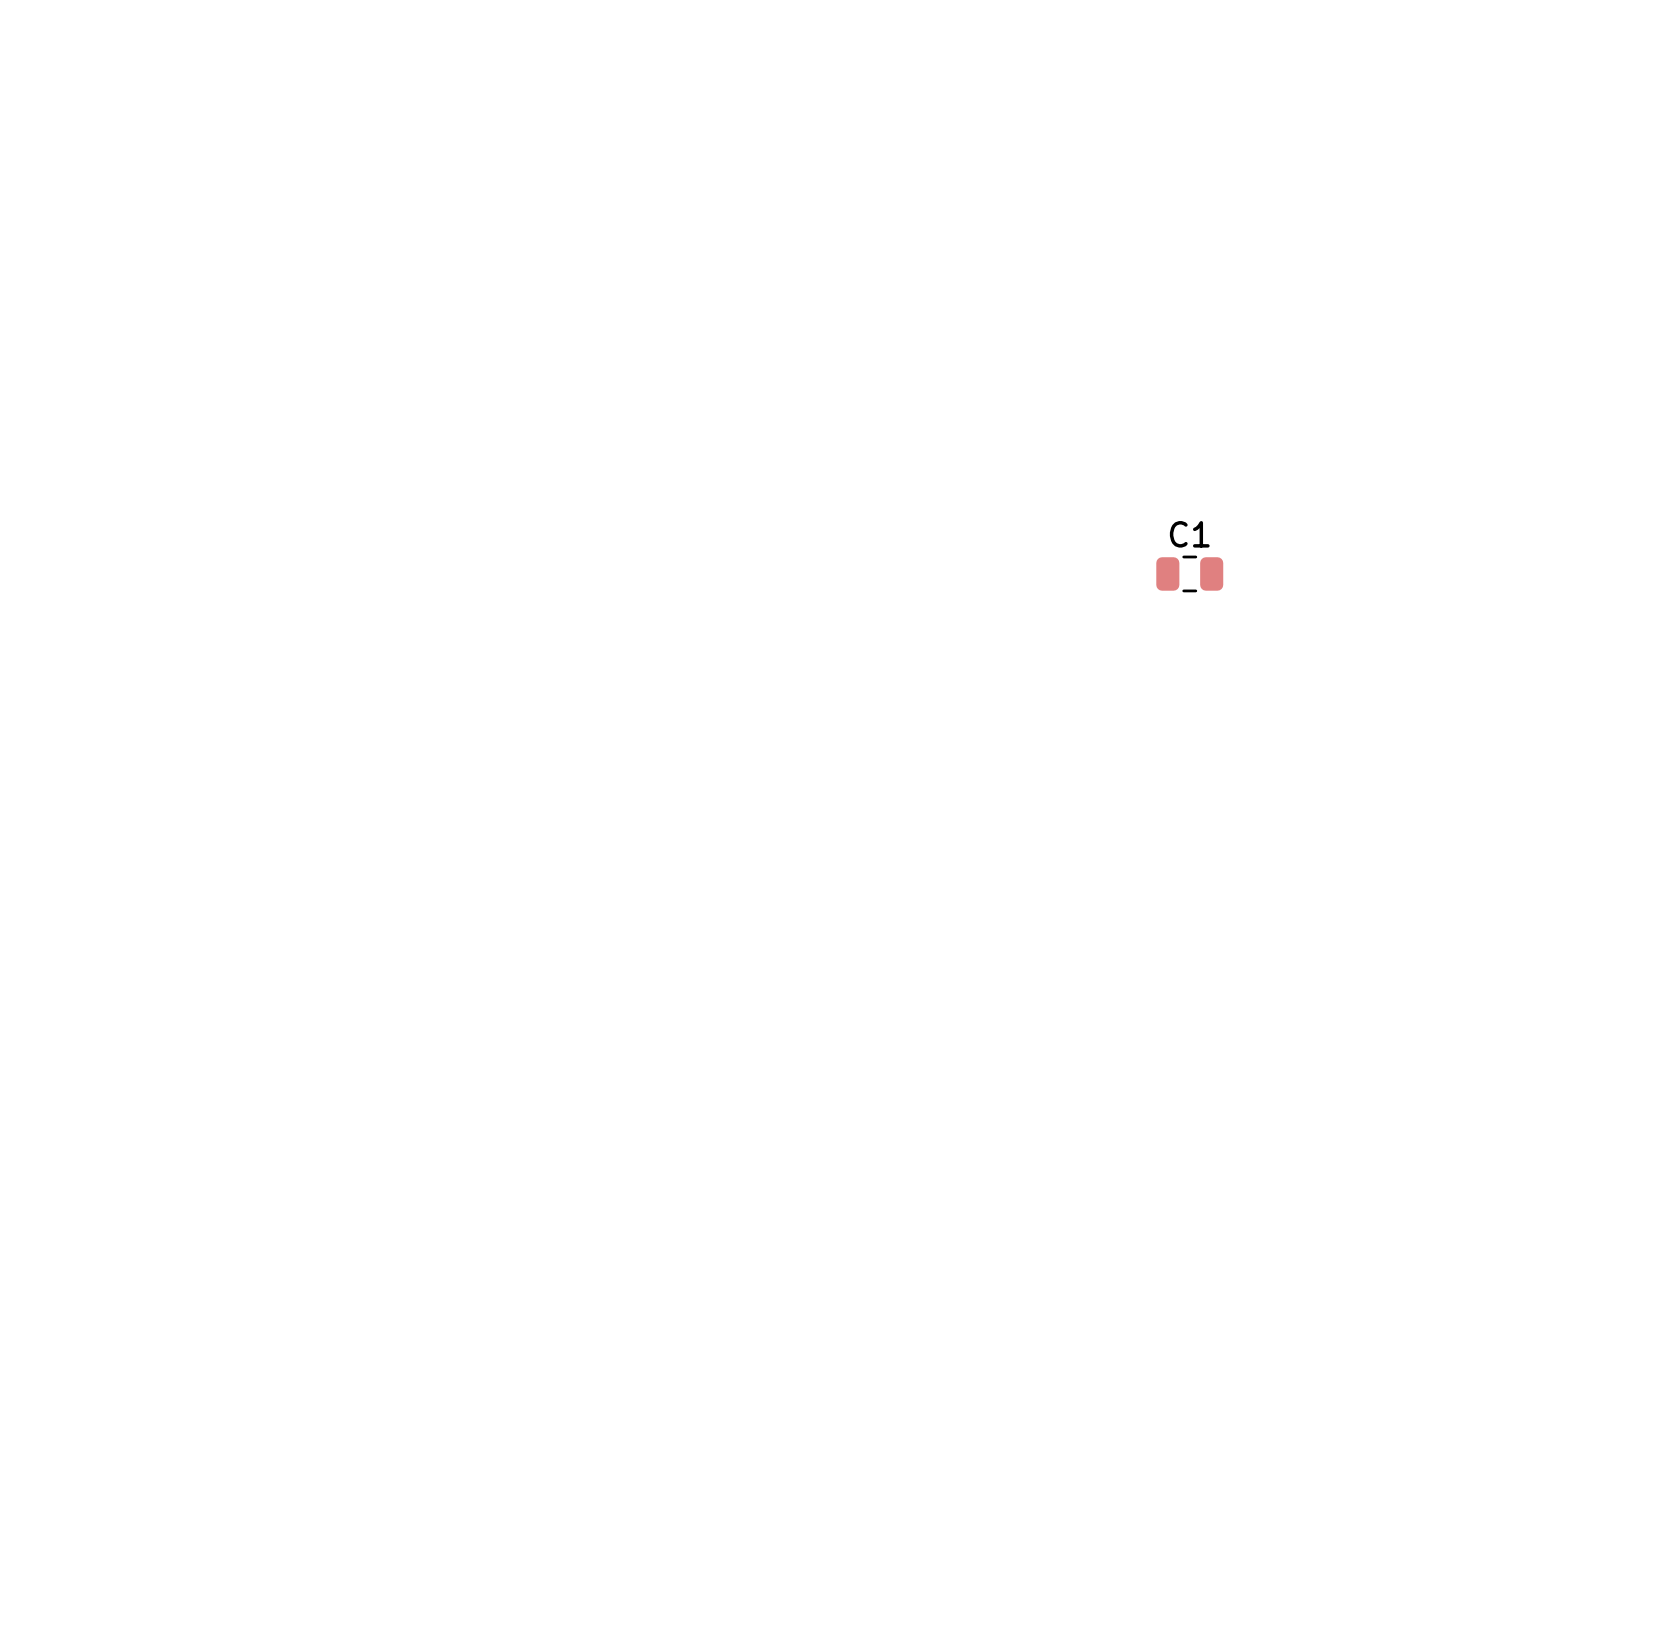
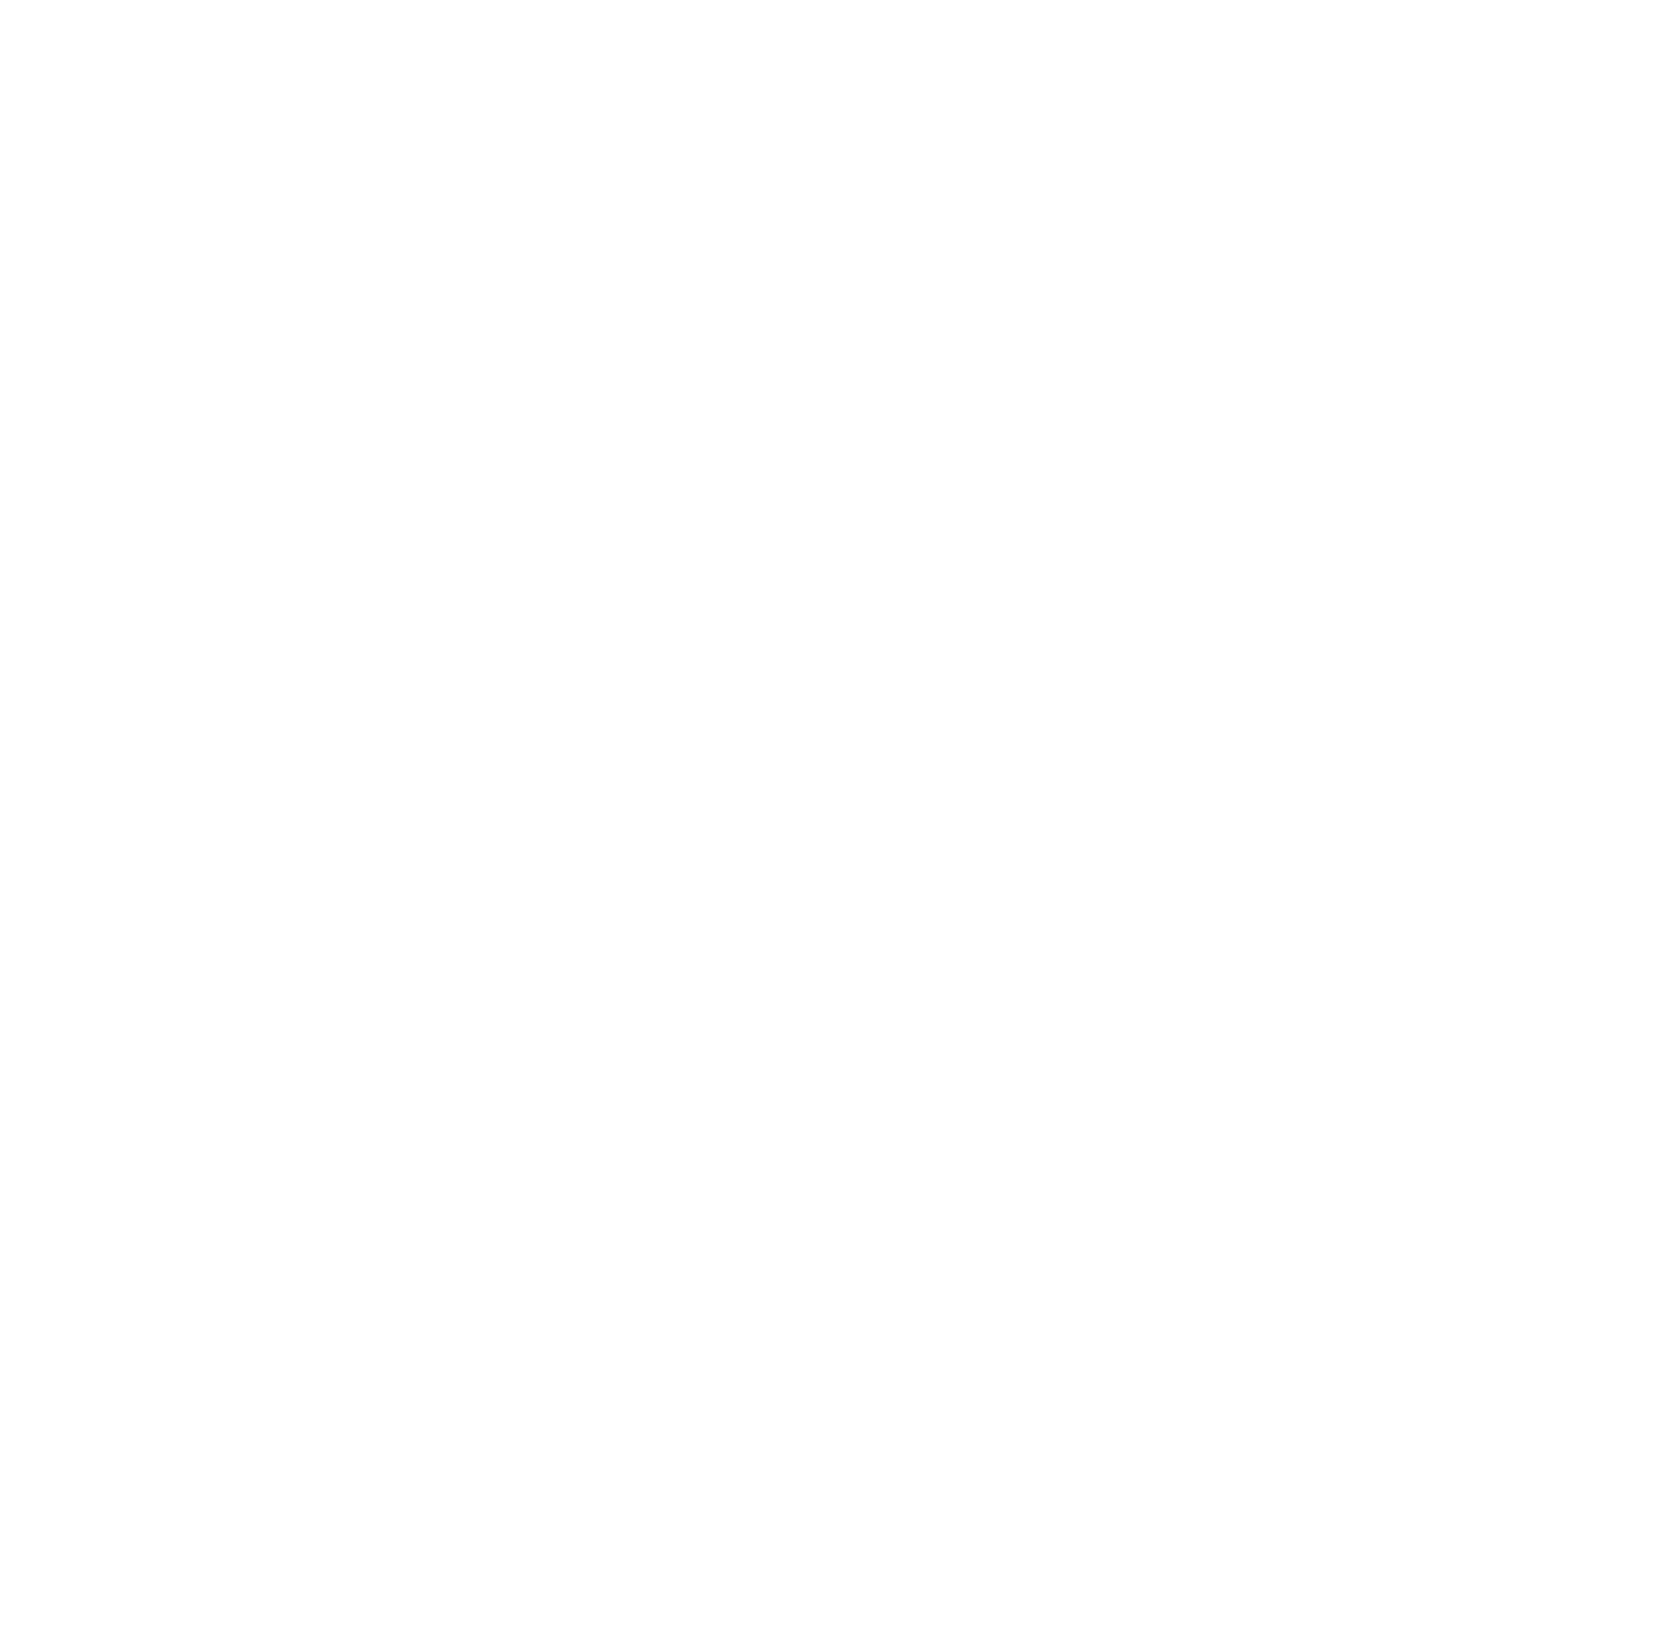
C1: (1189, 573) -> none

